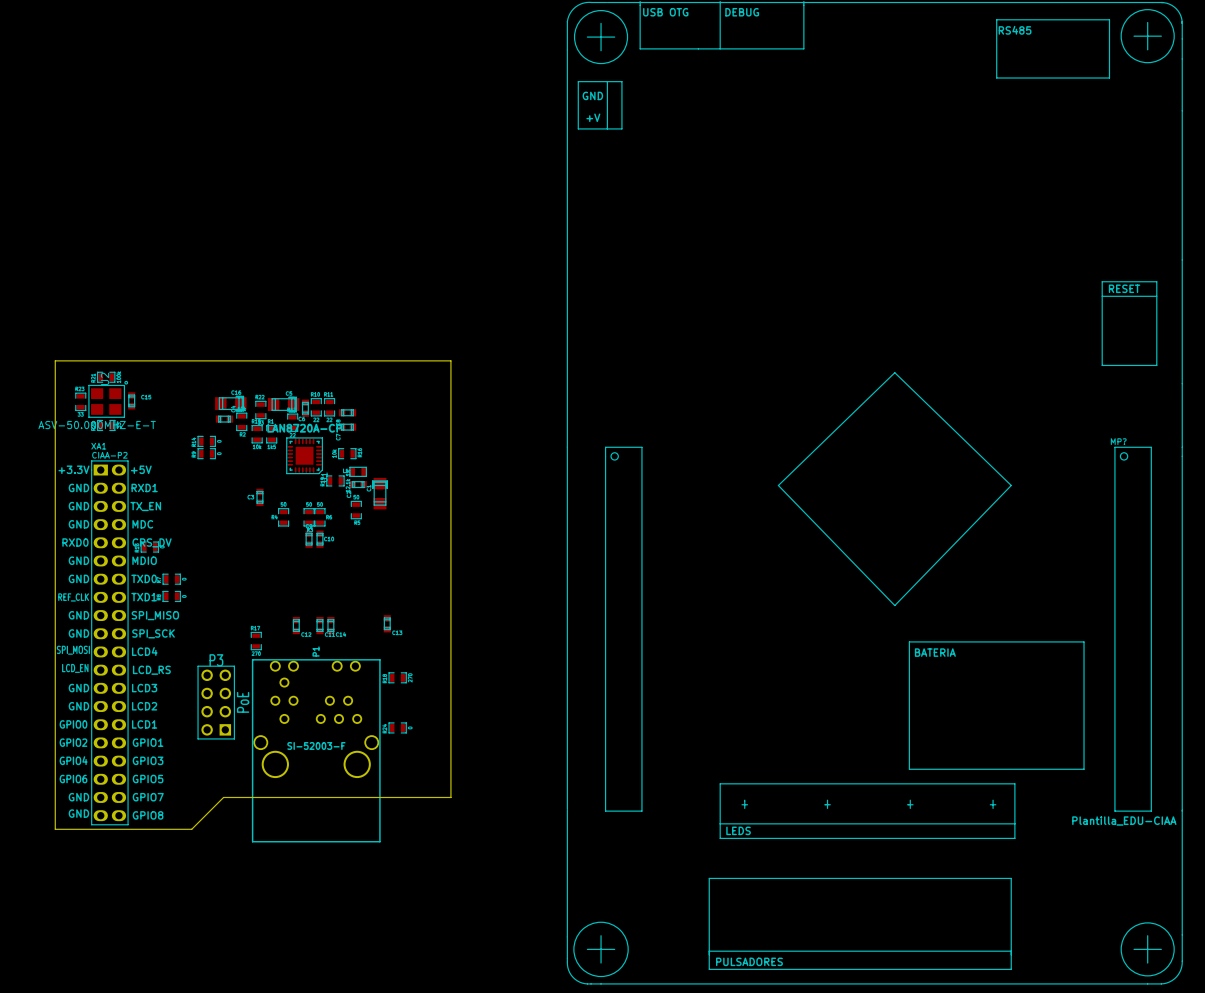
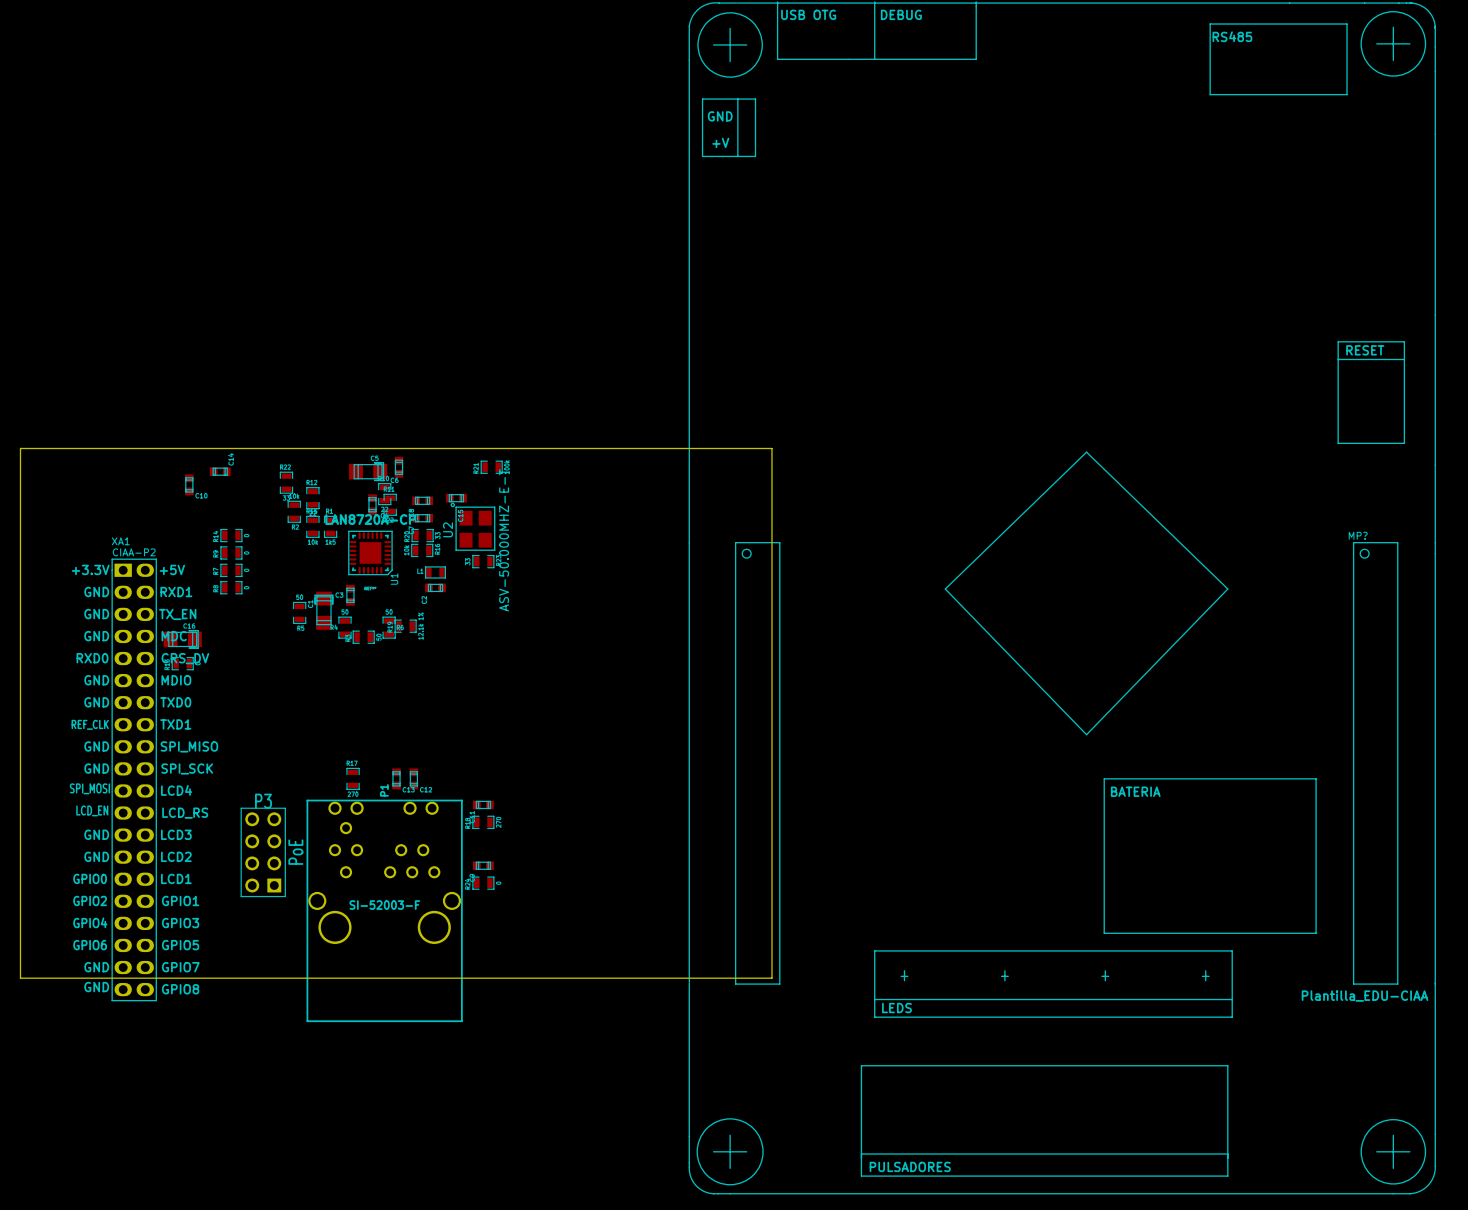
board edge: (55, 360) (55, 829) (191, 829) (223, 797) (450, 797) (450, 360) (55, 360) -> (20, 448) (20, 978) (771, 978) (771, 448) (20, 448)
part position: (106, 377) -> (491, 467)
U2 rotation: 0° (108, 399) -> 90° counterclockwise (472, 526)
U2 position: (108, 399) -> (472, 526)
part rotation: 0° (131, 400) -> 90° clockwise (456, 498)
part position: (131, 400) -> (456, 498)
part rotation: 0° (80, 401) -> 90° clockwise (483, 561)
part position: (80, 401) -> (483, 561)
part position: (230, 403) -> (182, 639)
part position: (283, 404) -> (368, 471)
part position: (329, 407) -> (390, 504)
part position: (305, 408) -> (398, 467)
part position: (260, 410) -> (286, 482)
part rotation: 0° (224, 419) -> 90° clockwise (372, 504)
part position: (224, 419) -> (372, 504)
part position: (292, 422) -> (312, 498)
part position: (106, 425) -> (422, 535)
part position: (206, 441) -> (231, 535)
part position: (206, 453) -> (231, 552)
part position: (335, 480) -> (405, 626)
part: none -> (370, 588)
part position: (380, 493) -> (323, 610)
part position: (259, 497) -> (350, 595)
part position: (356, 510) -> (299, 612)
part rotation: 0° (309, 517) -> 90° clockwise (363, 637)
part position: (309, 517) -> (363, 637)
part rotation: 0° (309, 539) -> 90° counterclockwise (483, 865)
part position: (309, 539) -> (483, 865)
part rotation: 0° (319, 539) -> 180° (189, 484)
part position: (319, 539) -> (189, 484)
part position: (171, 579) -> (231, 570)
part position: (171, 596) -> (231, 587)
part position: (387, 623) -> (396, 778)
part position: (296, 625) -> (413, 778)
part rotation: 0° (319, 625) -> 90° clockwise (483, 804)
part position: (319, 625) -> (483, 804)
part rotation: 0° (330, 625) -> 90° counterclockwise (220, 471)
part position: (330, 625) -> (220, 471)
part position: (256, 641) -> (353, 778)

